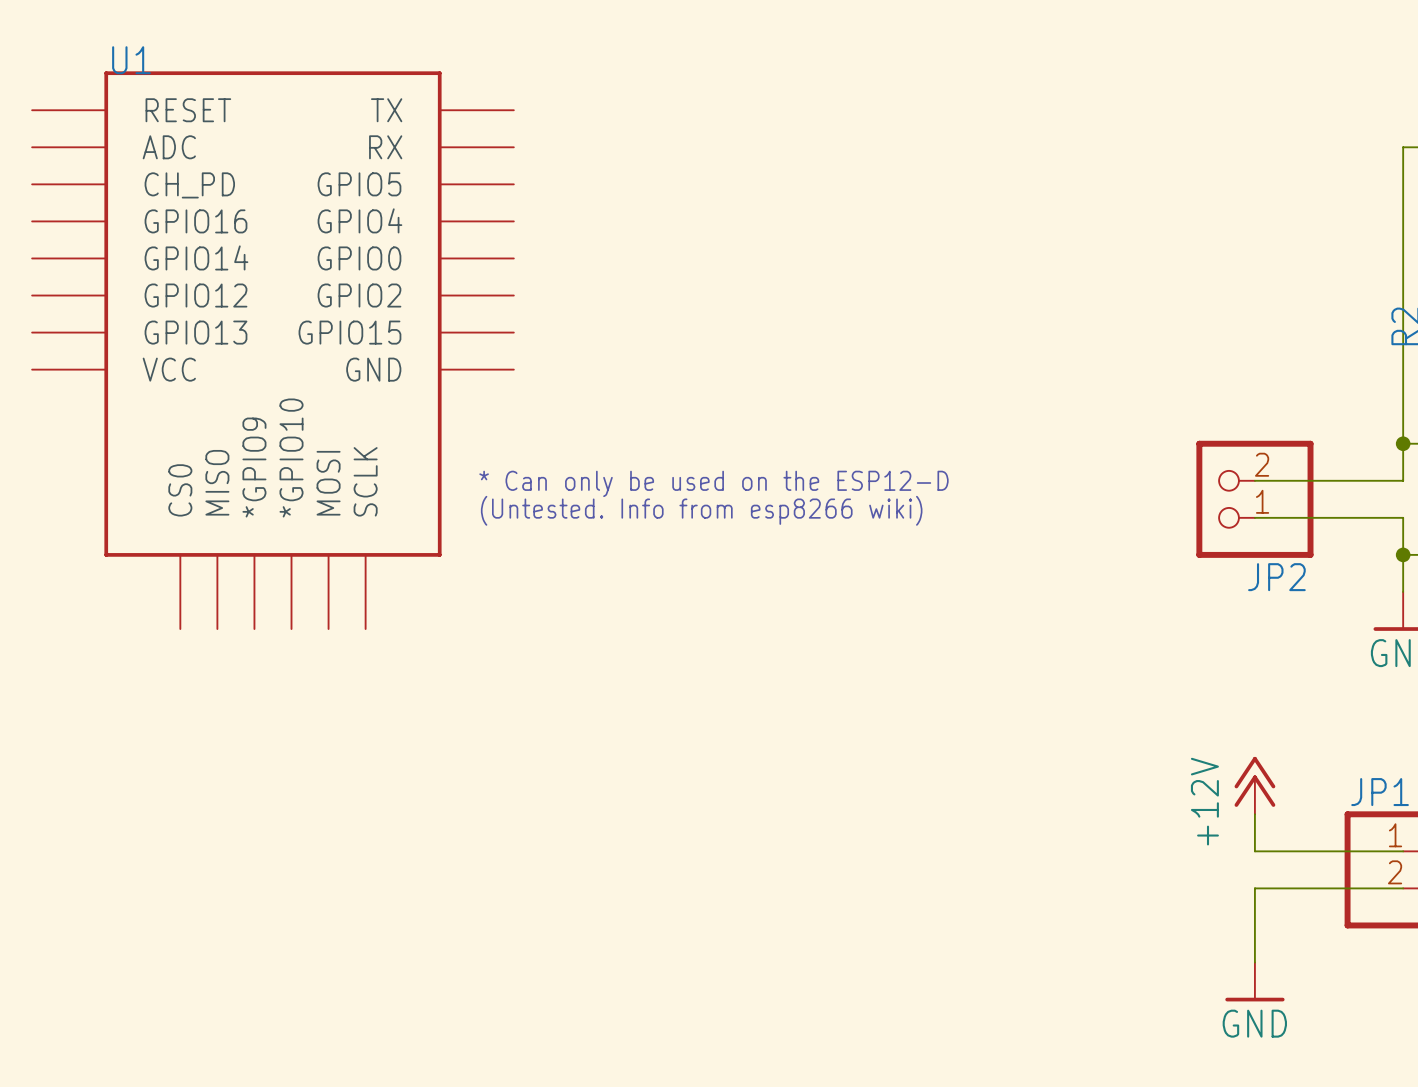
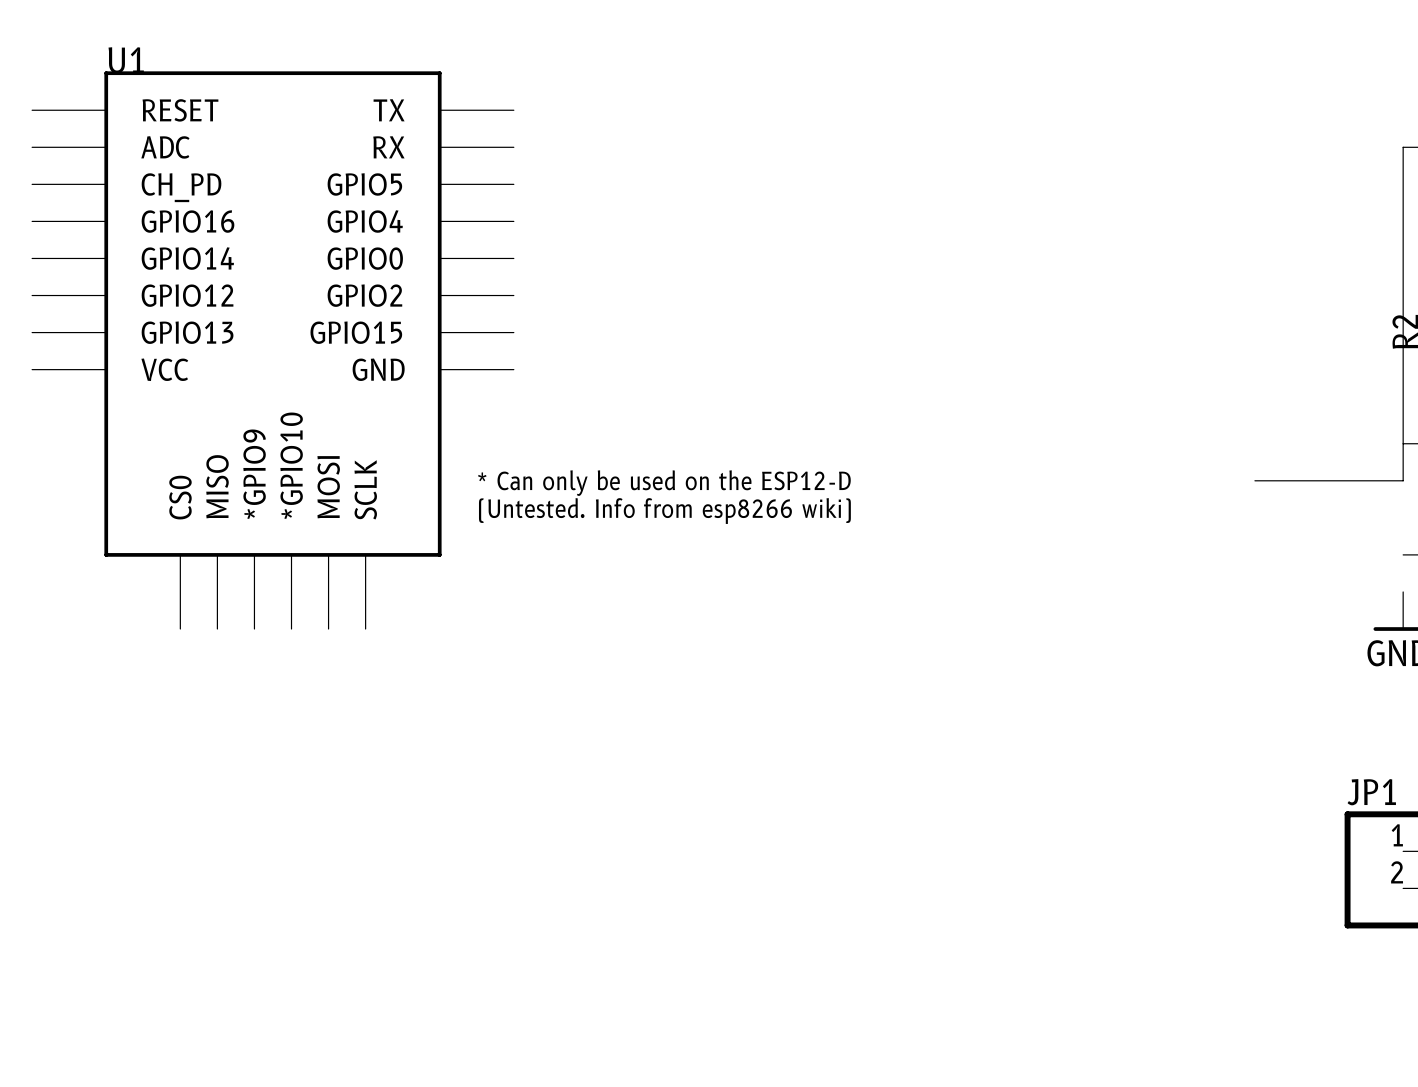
junction: (1403, 443) -> none
JP2: (1254, 499) -> none
wire: (1254, 517) (1403, 517) (1403, 591) -> none
junction: (1403, 554) -> none
power symbol: +12V (1254, 785) -> none
wire: (1254, 814) (1254, 851) (1403, 851) -> none
wire: (1403, 888) (1254, 888) (1254, 962) -> none
power symbol: GND (1254, 981) -> none

